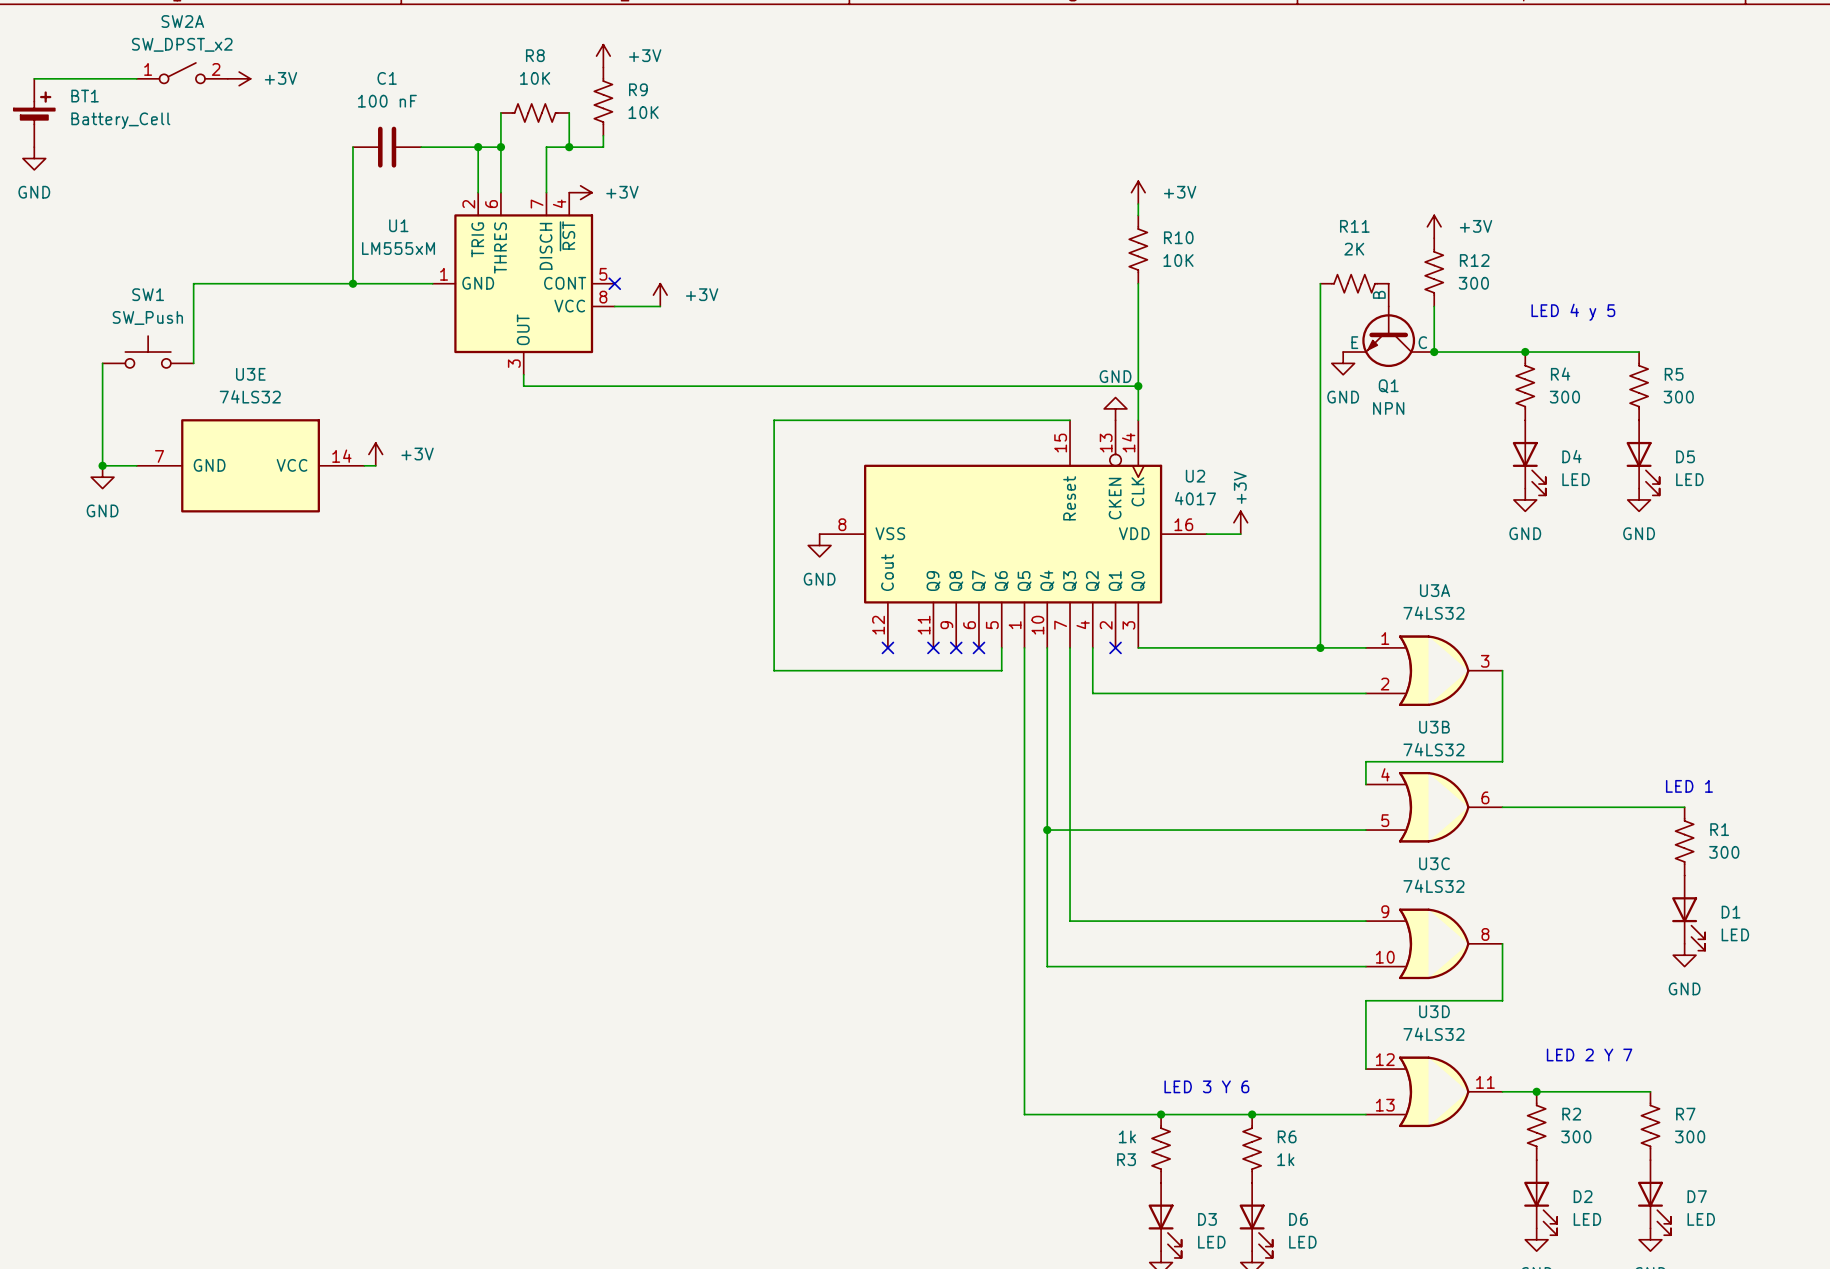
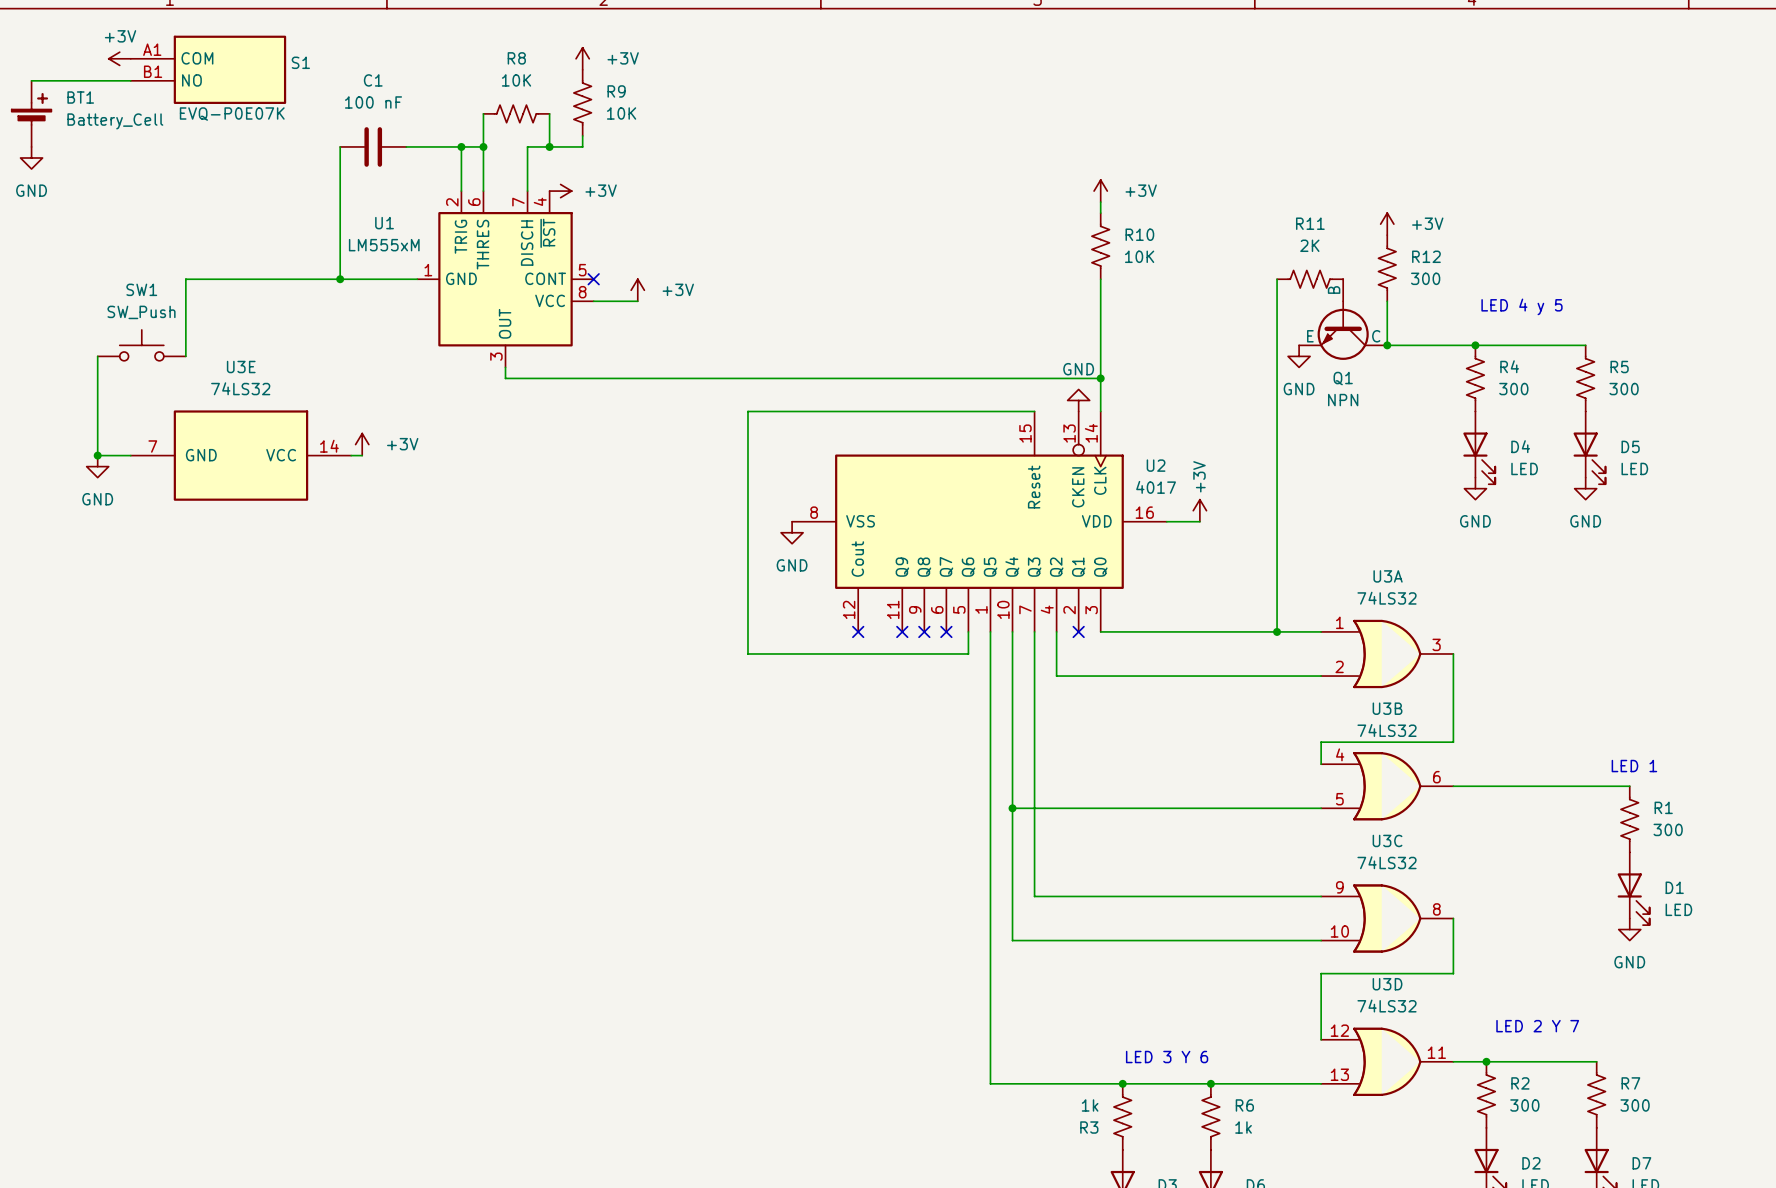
S1: none -> EVQ-P0E07K (208, 69)
SW2A: SW_DPST_x2 (182, 73) -> none
power symbol rotation: 0° (239, 78) -> 180° (119, 58)
power symbol position: +3V (239, 78) -> +3V (119, 58)
power symbol text position: +3V (280, 78) -> +3V (120, 36)

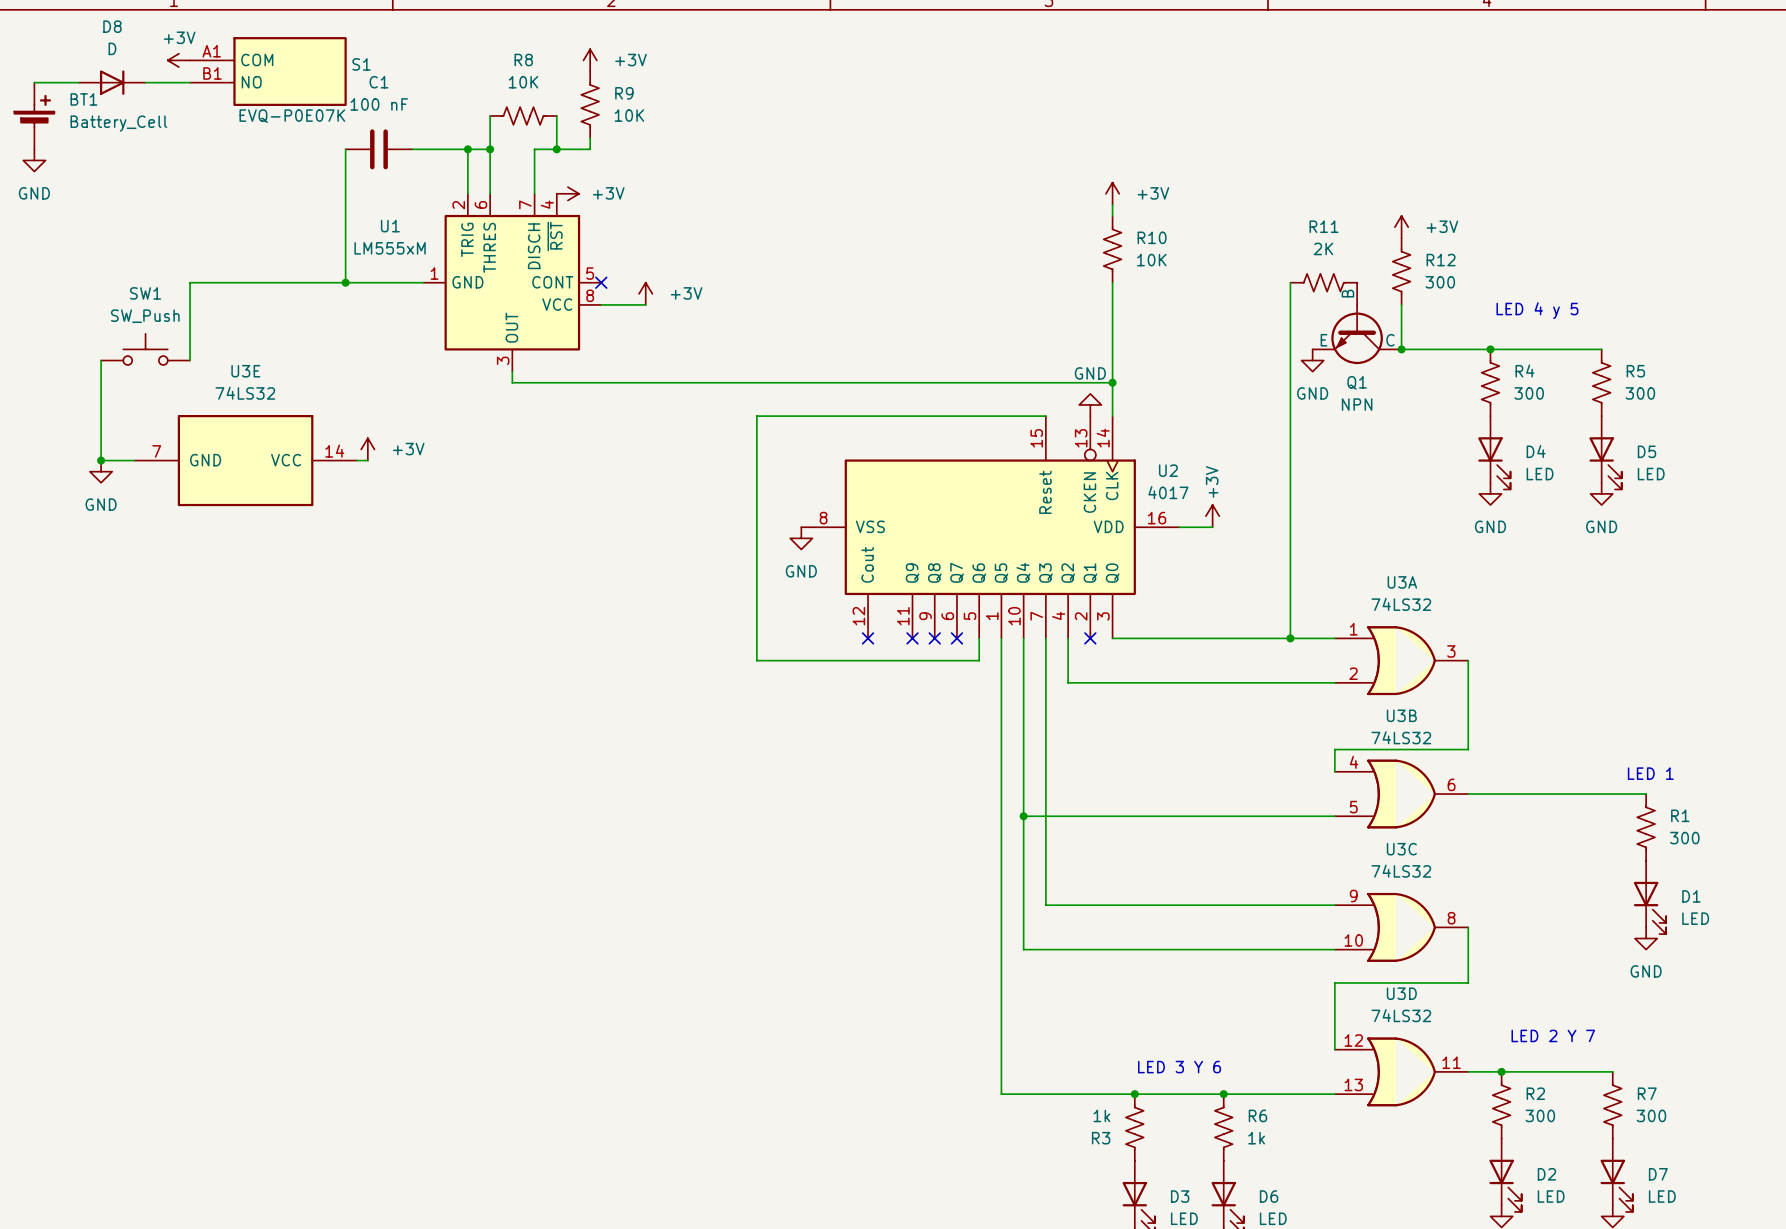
power symbol position: +3V (119, 58) -> +3V (178, 60)
S1 position: (208, 69) -> (268, 71)
D8: none -> D (112, 82)

